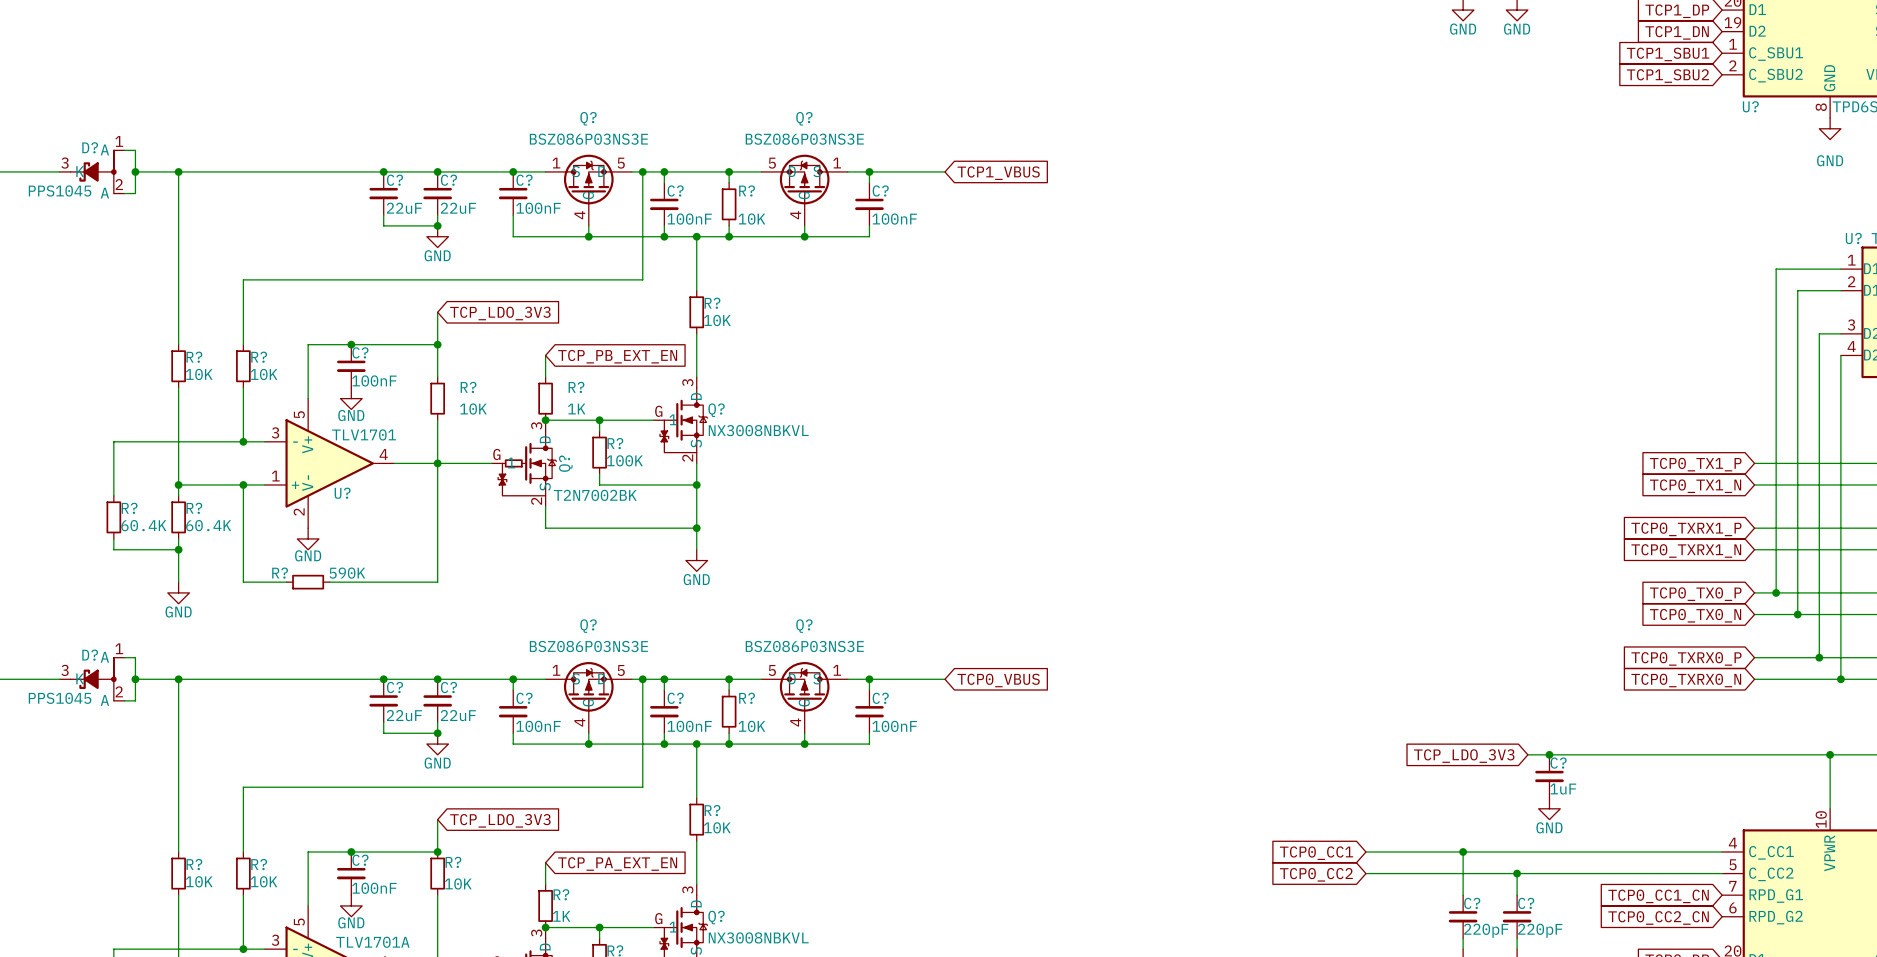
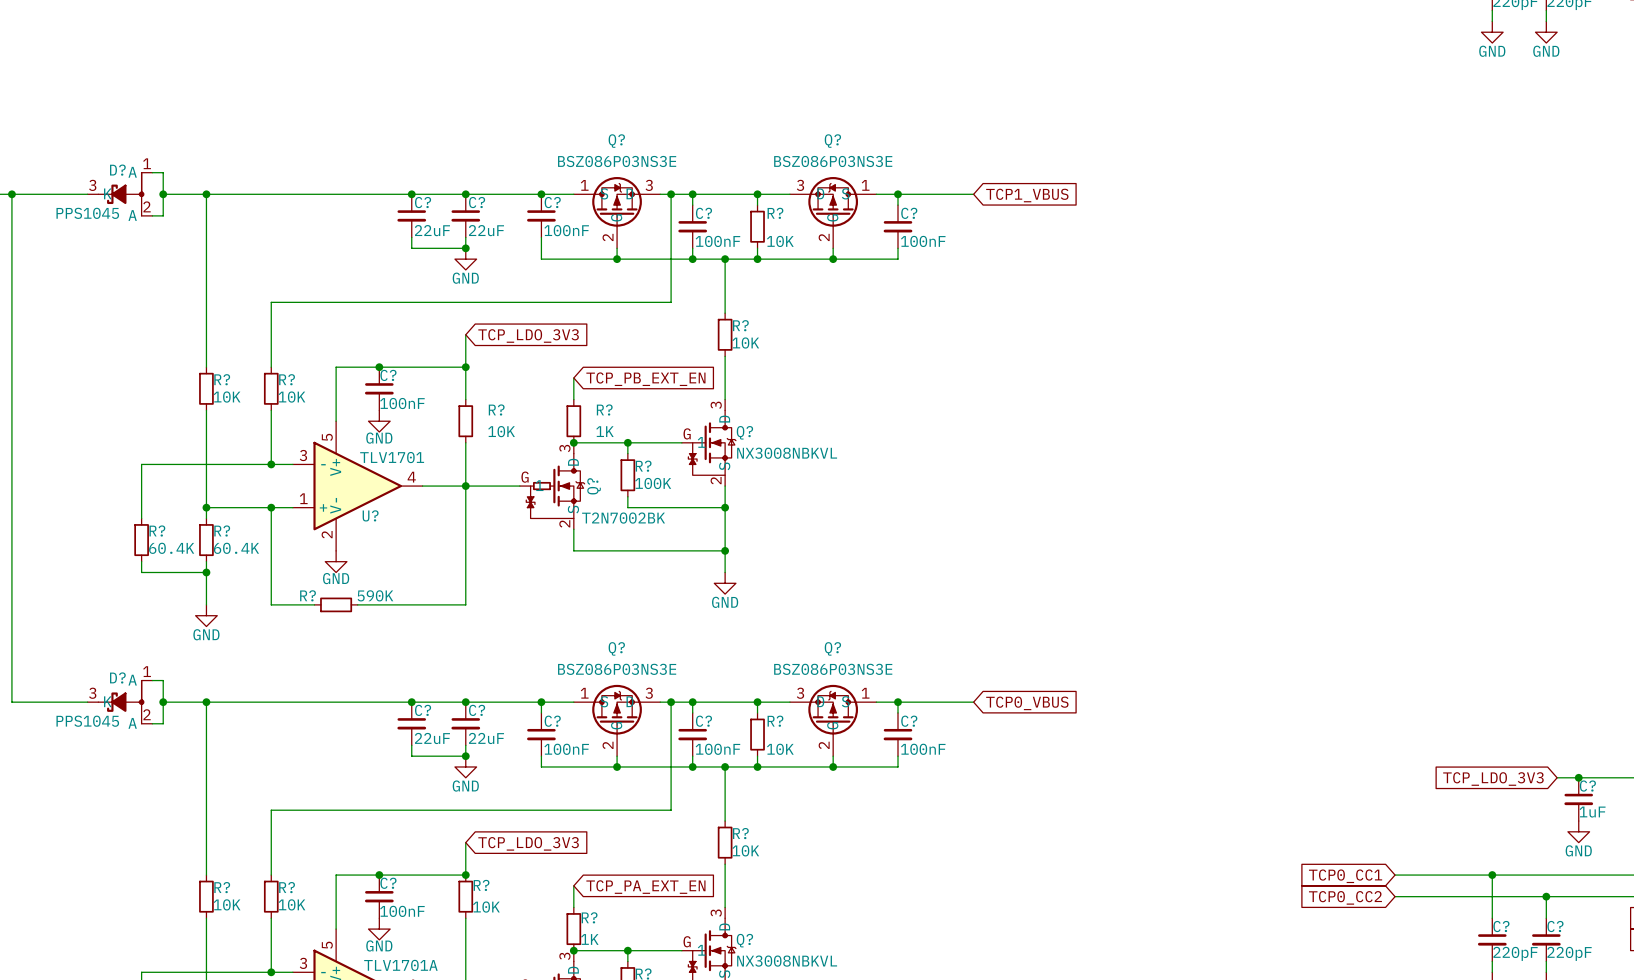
Q? pin number: 5 (621, 163) -> 3 (649, 185)
Q? pin number: 5 (772, 163) -> 3 (800, 185)
Q? pin number: 4 (579, 215) -> 2 (608, 237)
Q? pin number: 4 (795, 215) -> 2 (824, 237)
Q? pin number: 5 (621, 670) -> 3 (649, 693)
Q? pin number: 5 (772, 670) -> 3 (800, 693)
Q? pin number: 4 (579, 722) -> 2 (608, 745)
Q? pin number: 4 (795, 722) -> 2 (824, 745)

